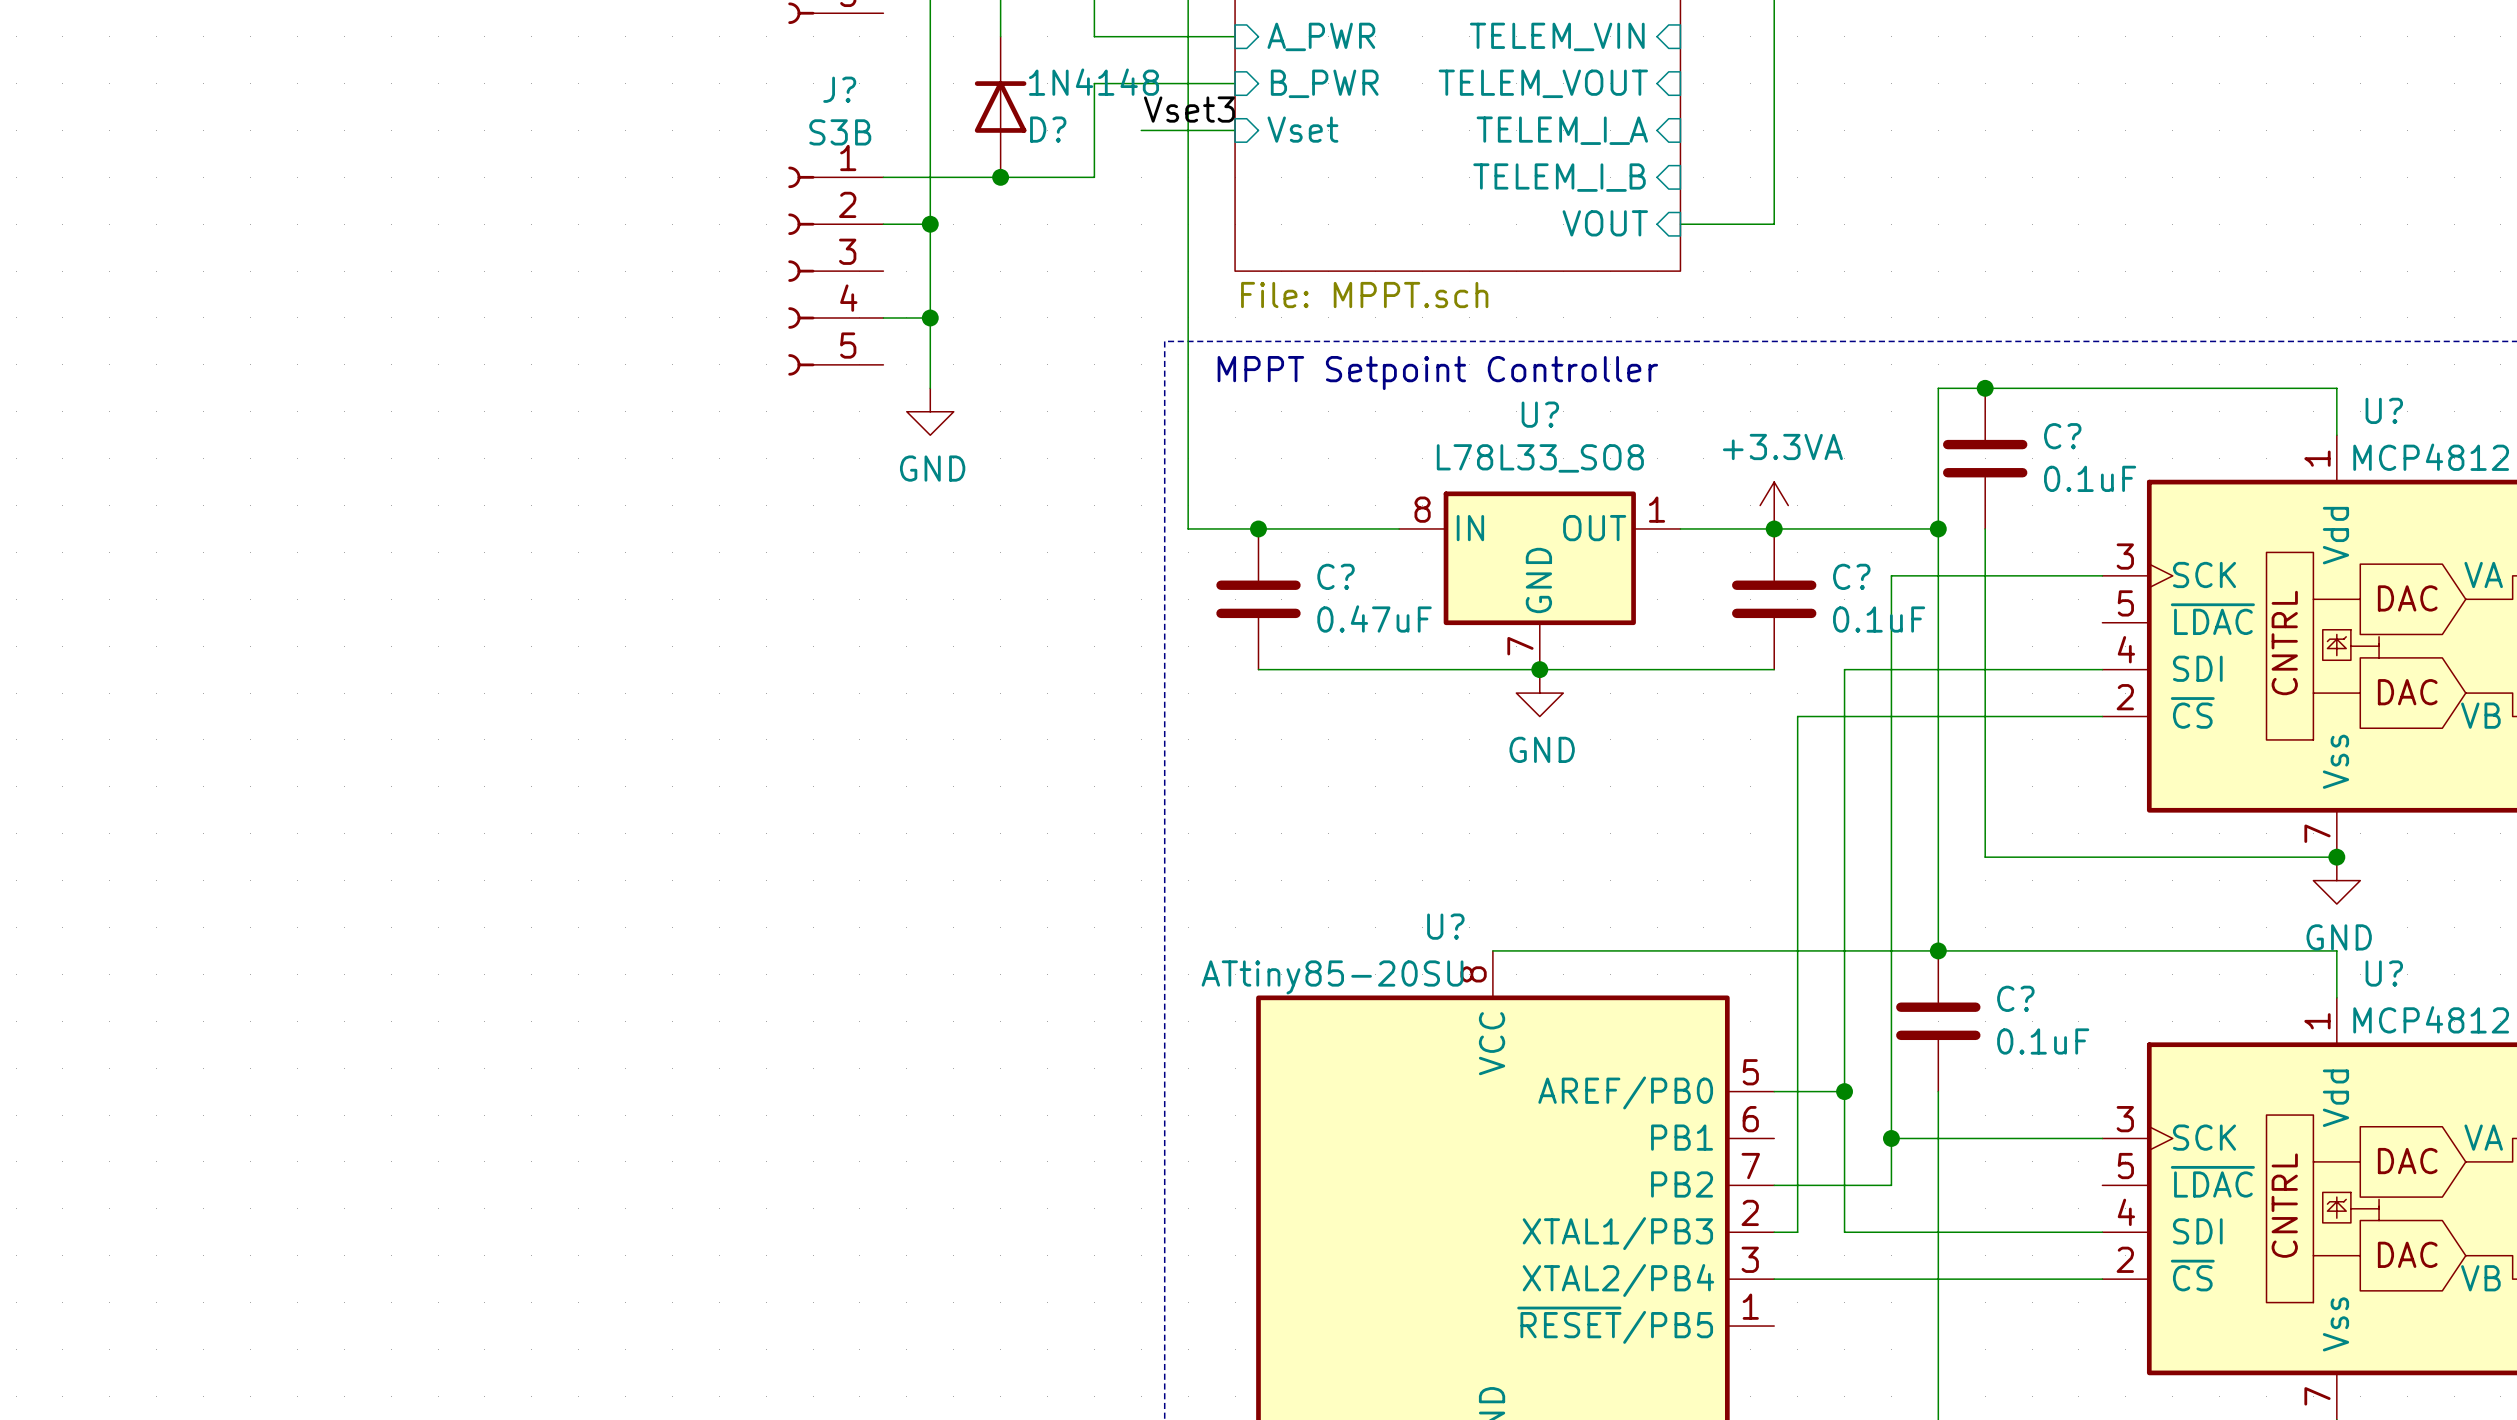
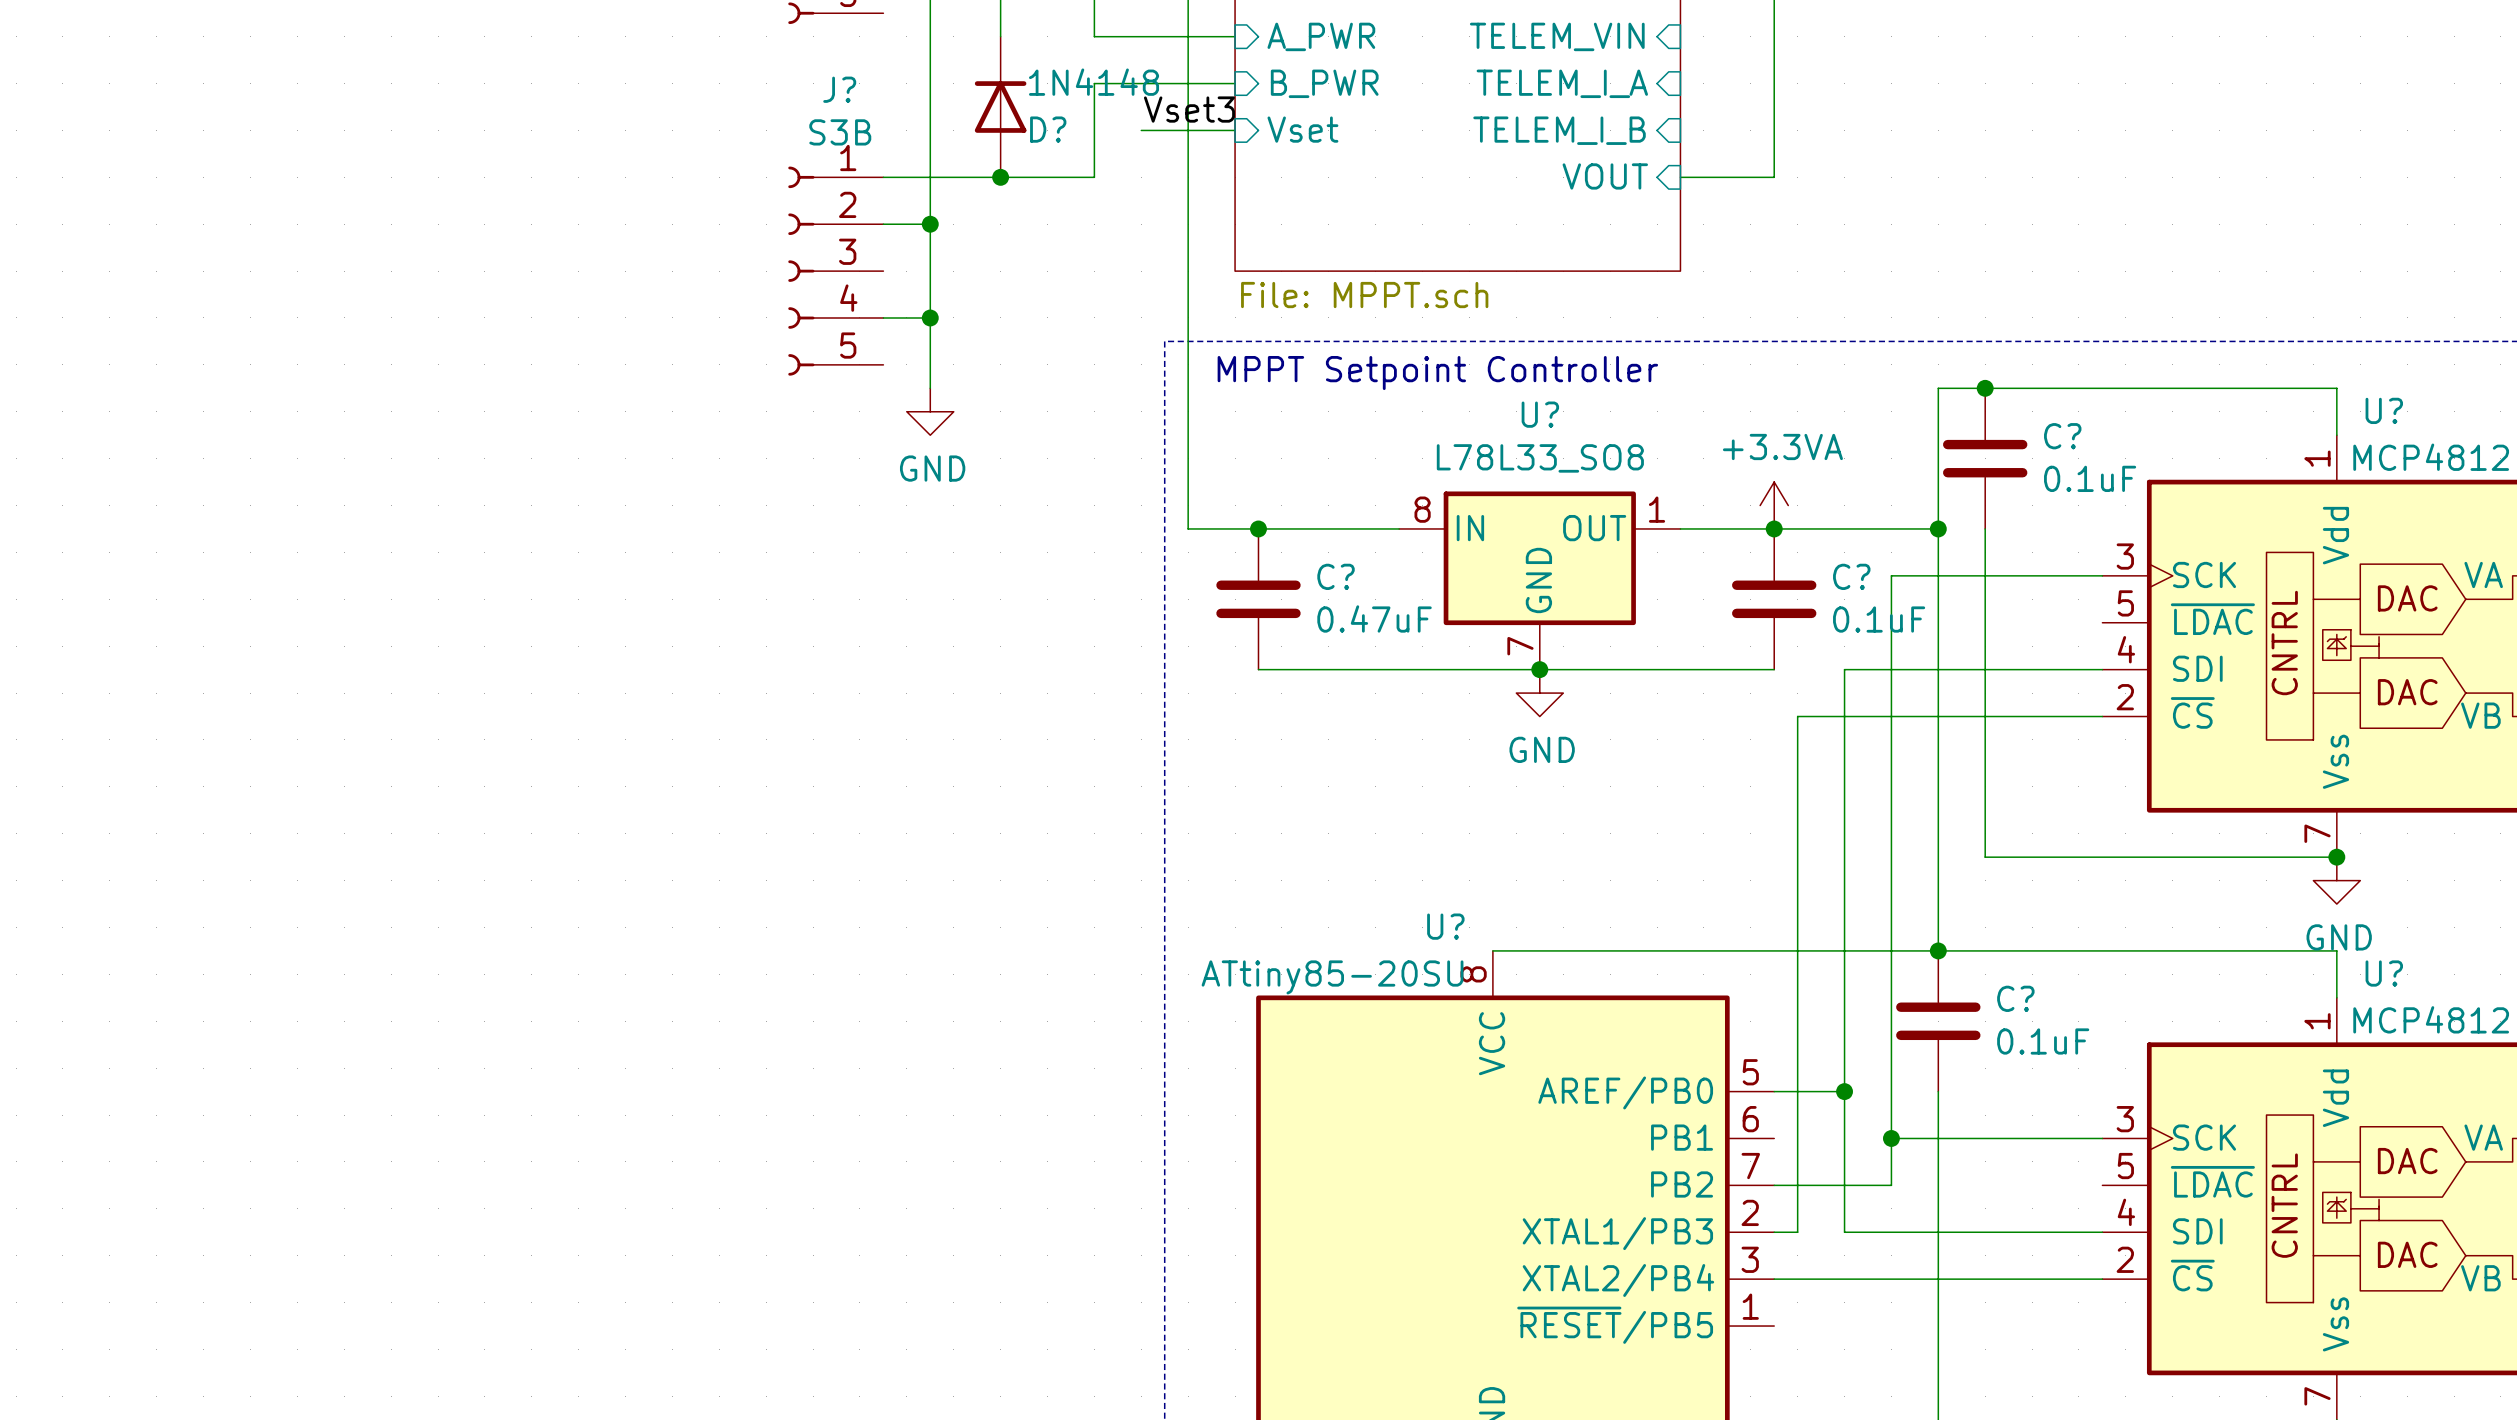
sheet pin: TELEM_VOUT (1543, 83) -> TELEM_I_A (1562, 83)
sheet pin: TELEM_I_A (1562, 130) -> TELEM_I_B (1559, 130)
sheet pin: TELEM_I_B (1559, 177) -> VOUT (1605, 176)
wire: (1774, 177) (1774, 224) (1680, 224) -> (1774, 177) (1680, 177)
sheet pin: VOUT (1605, 223) -> none

